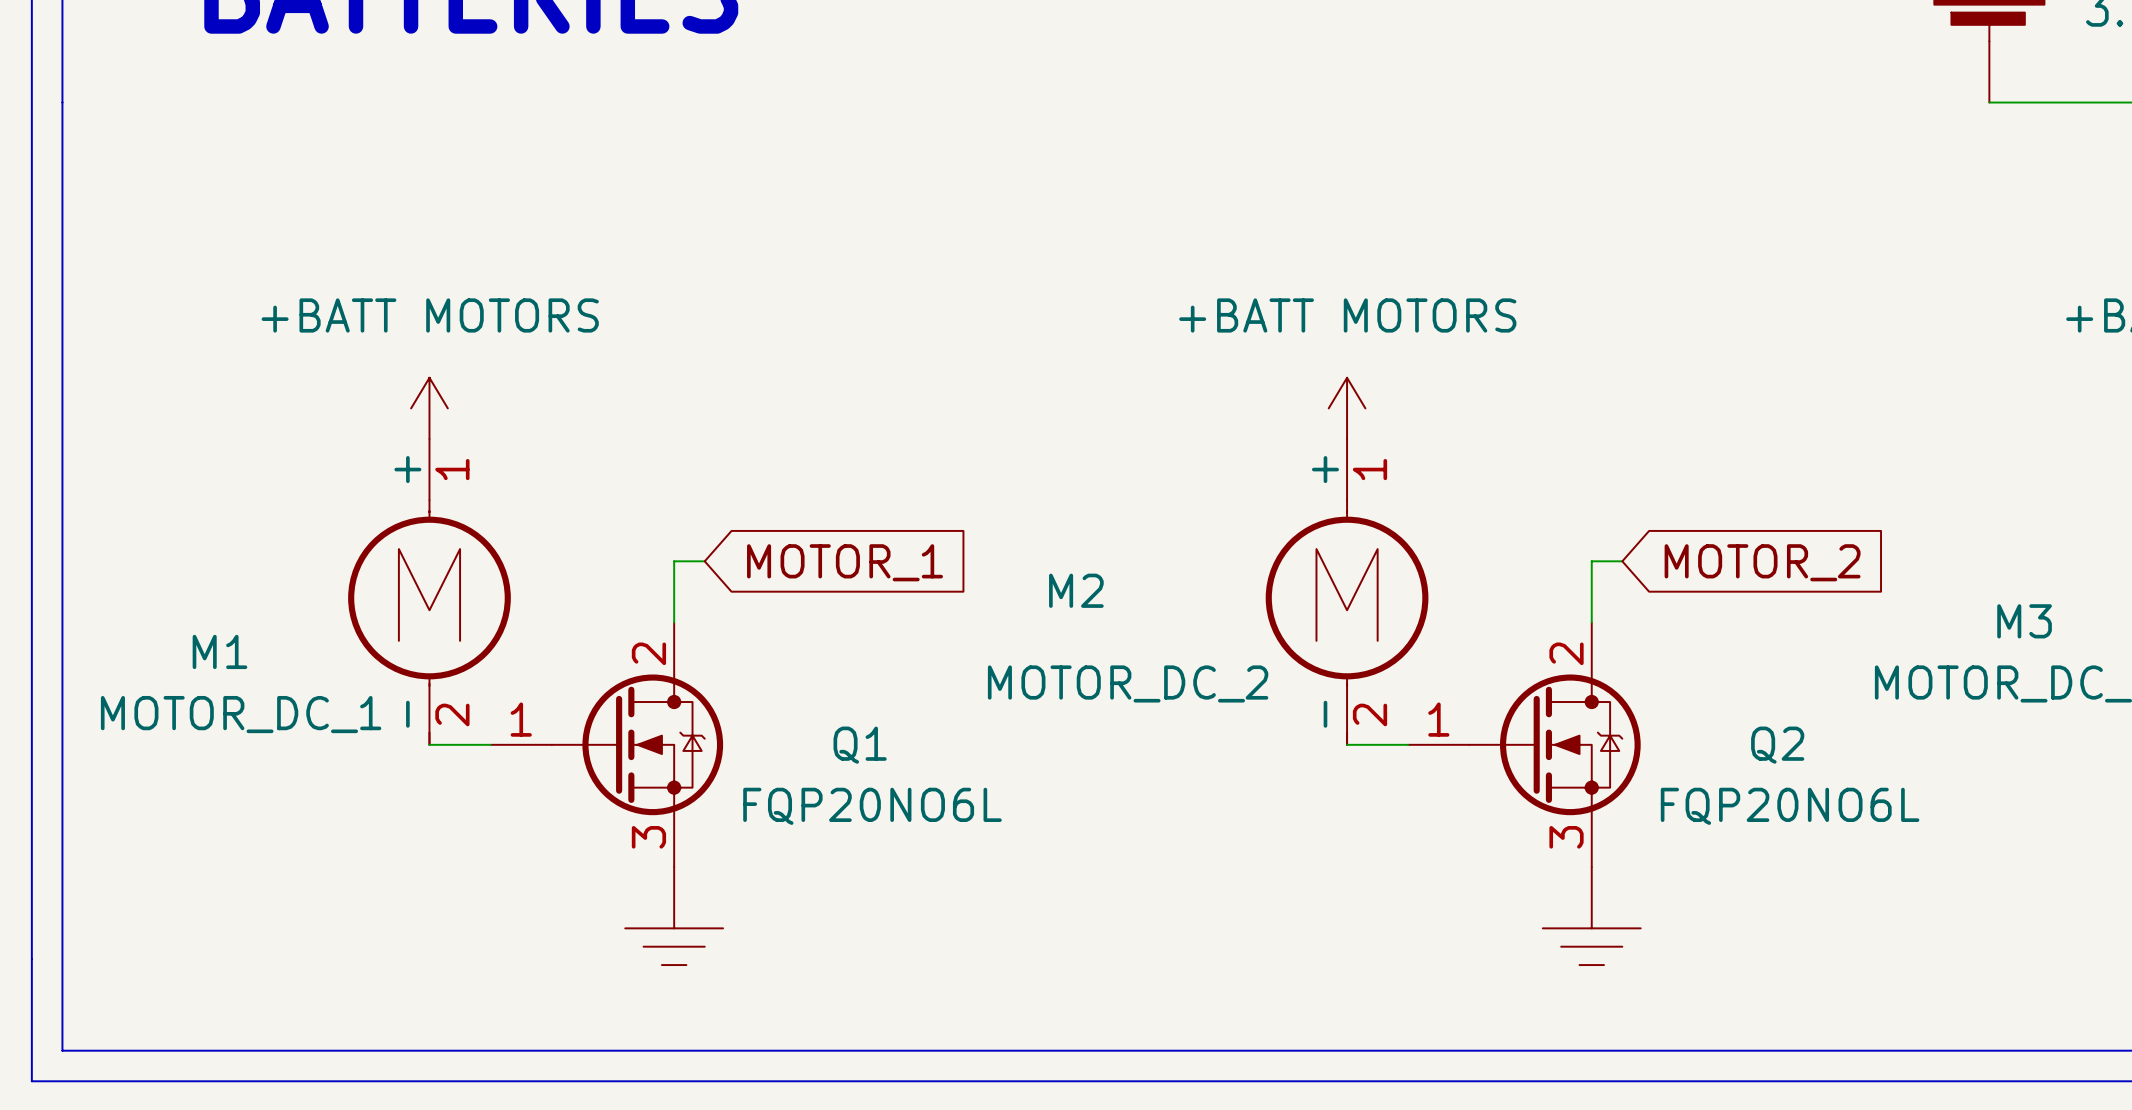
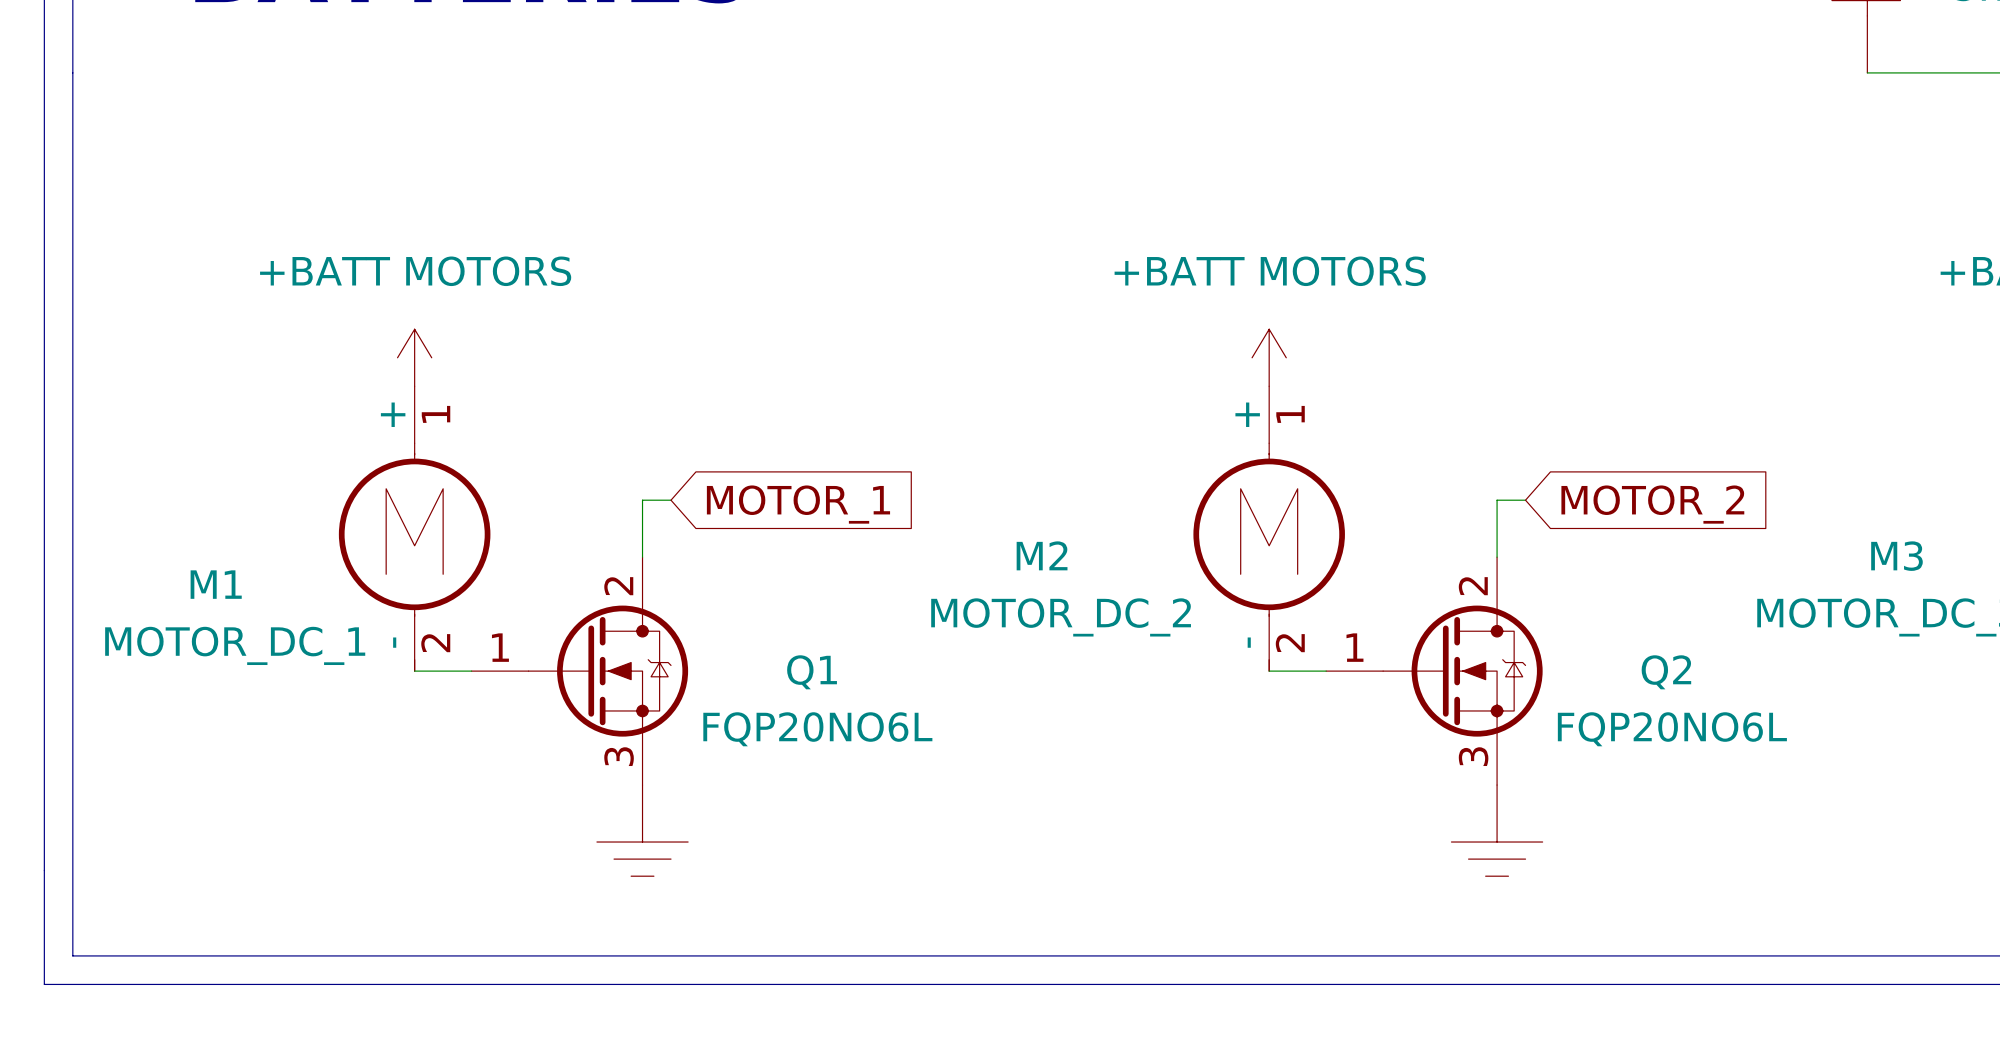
M2 name position: M2 (1076, 590) -> M2 (1042, 555)

